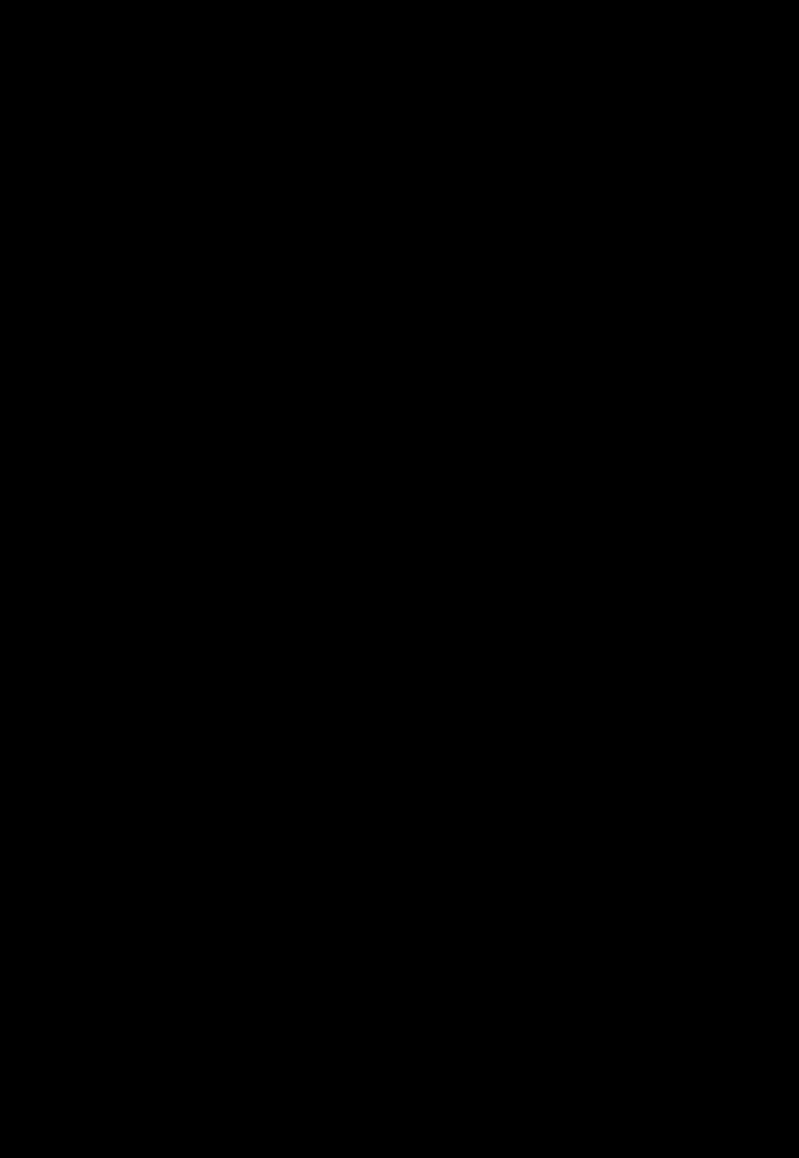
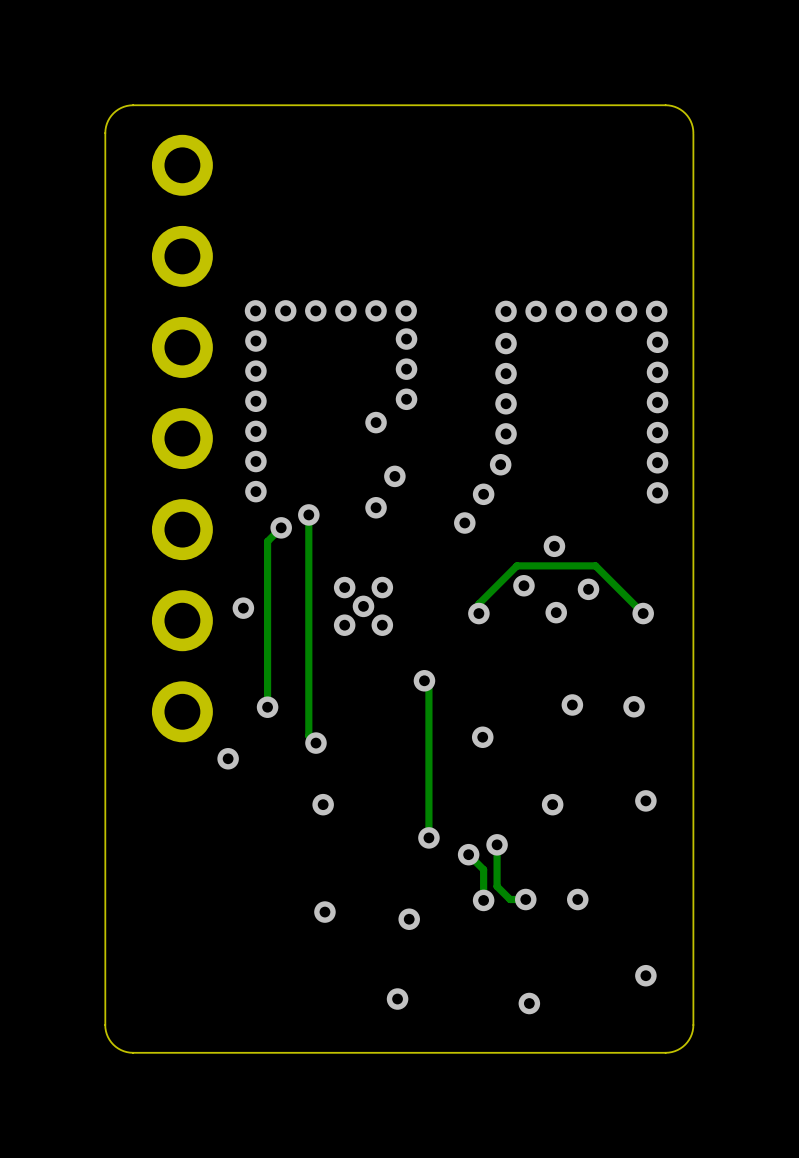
board edge: none -> (693, 133) (690, 120) (685, 113) (674, 106) (665, 105) (133, 105) (118, 109) (109, 118) (105, 133) (105, 1025) (107, 1037) (118, 1048) (133, 1052) (665, 1052) (677, 1050) (689, 1039) (693, 1025) (693, 133)
via: none -> (255, 310)
via: none -> (285, 310)
via: none -> (315, 310)
via: none -> (345, 310)
via: none -> (376, 310)
via: none -> (406, 310)
via: none -> (506, 311)
via: none -> (536, 311)
via: none -> (566, 311)
via: none -> (596, 311)
via: none -> (626, 311)
via: none -> (656, 311)
via: none -> (406, 339)
via: none -> (255, 341)
via: none -> (657, 342)
via: none -> (506, 343)
via: none -> (406, 369)
via: none -> (255, 371)
via: none -> (657, 372)
via: none -> (506, 373)
via: none -> (406, 399)
via: none -> (255, 401)
via: none -> (657, 402)
via: none -> (506, 403)
via: none -> (376, 422)
via: none -> (255, 431)
via: none -> (657, 432)
via: none -> (506, 433)
part: none -> (182, 438)
via: none -> (255, 461)
via: none -> (657, 462)
via: none -> (500, 464)
via: none -> (394, 476)
via: none -> (255, 491)
via: none -> (657, 492)
via: none -> (483, 494)
via: none -> (376, 507)
track: none -> (308, 514) (308, 735) (315, 743)
via: none -> (308, 514)
via: none -> (464, 523)
track: none -> (281, 527) (267, 541) (267, 707)
via: none -> (281, 527)
via: none -> (554, 546)
via: none -> (523, 585)
via: none -> (344, 587)
via: none -> (382, 587)
via: none -> (588, 589)
via: none -> (363, 606)
via: none -> (243, 608)
via: none -> (556, 612)
via: none -> (478, 613)
track: none -> (643, 613) (595, 565) (516, 565) (478, 603) (478, 613)
via: none -> (643, 613)
via: none -> (344, 625)
via: none -> (382, 625)
track: none -> (424, 680) (428, 685) (428, 837)
via: none -> (424, 680)
via: none -> (572, 704)
via: none -> (634, 706)
via: none -> (267, 707)
via: none -> (482, 737)
via: none -> (315, 743)
via: none -> (228, 758)
via: none -> (645, 800)
via: none -> (323, 804)
via: none -> (552, 804)
via: none -> (428, 837)
track: none -> (497, 844) (497, 886) (510, 899) (525, 899)
via: none -> (497, 844)
track: none -> (468, 854) (483, 869) (483, 900)
via: none -> (468, 854)
via: none -> (525, 899)
via: none -> (577, 899)
via: none -> (483, 900)
via: none -> (324, 912)
via: none -> (409, 919)
via: none -> (645, 975)
via: none -> (397, 999)
via: none -> (529, 1003)

